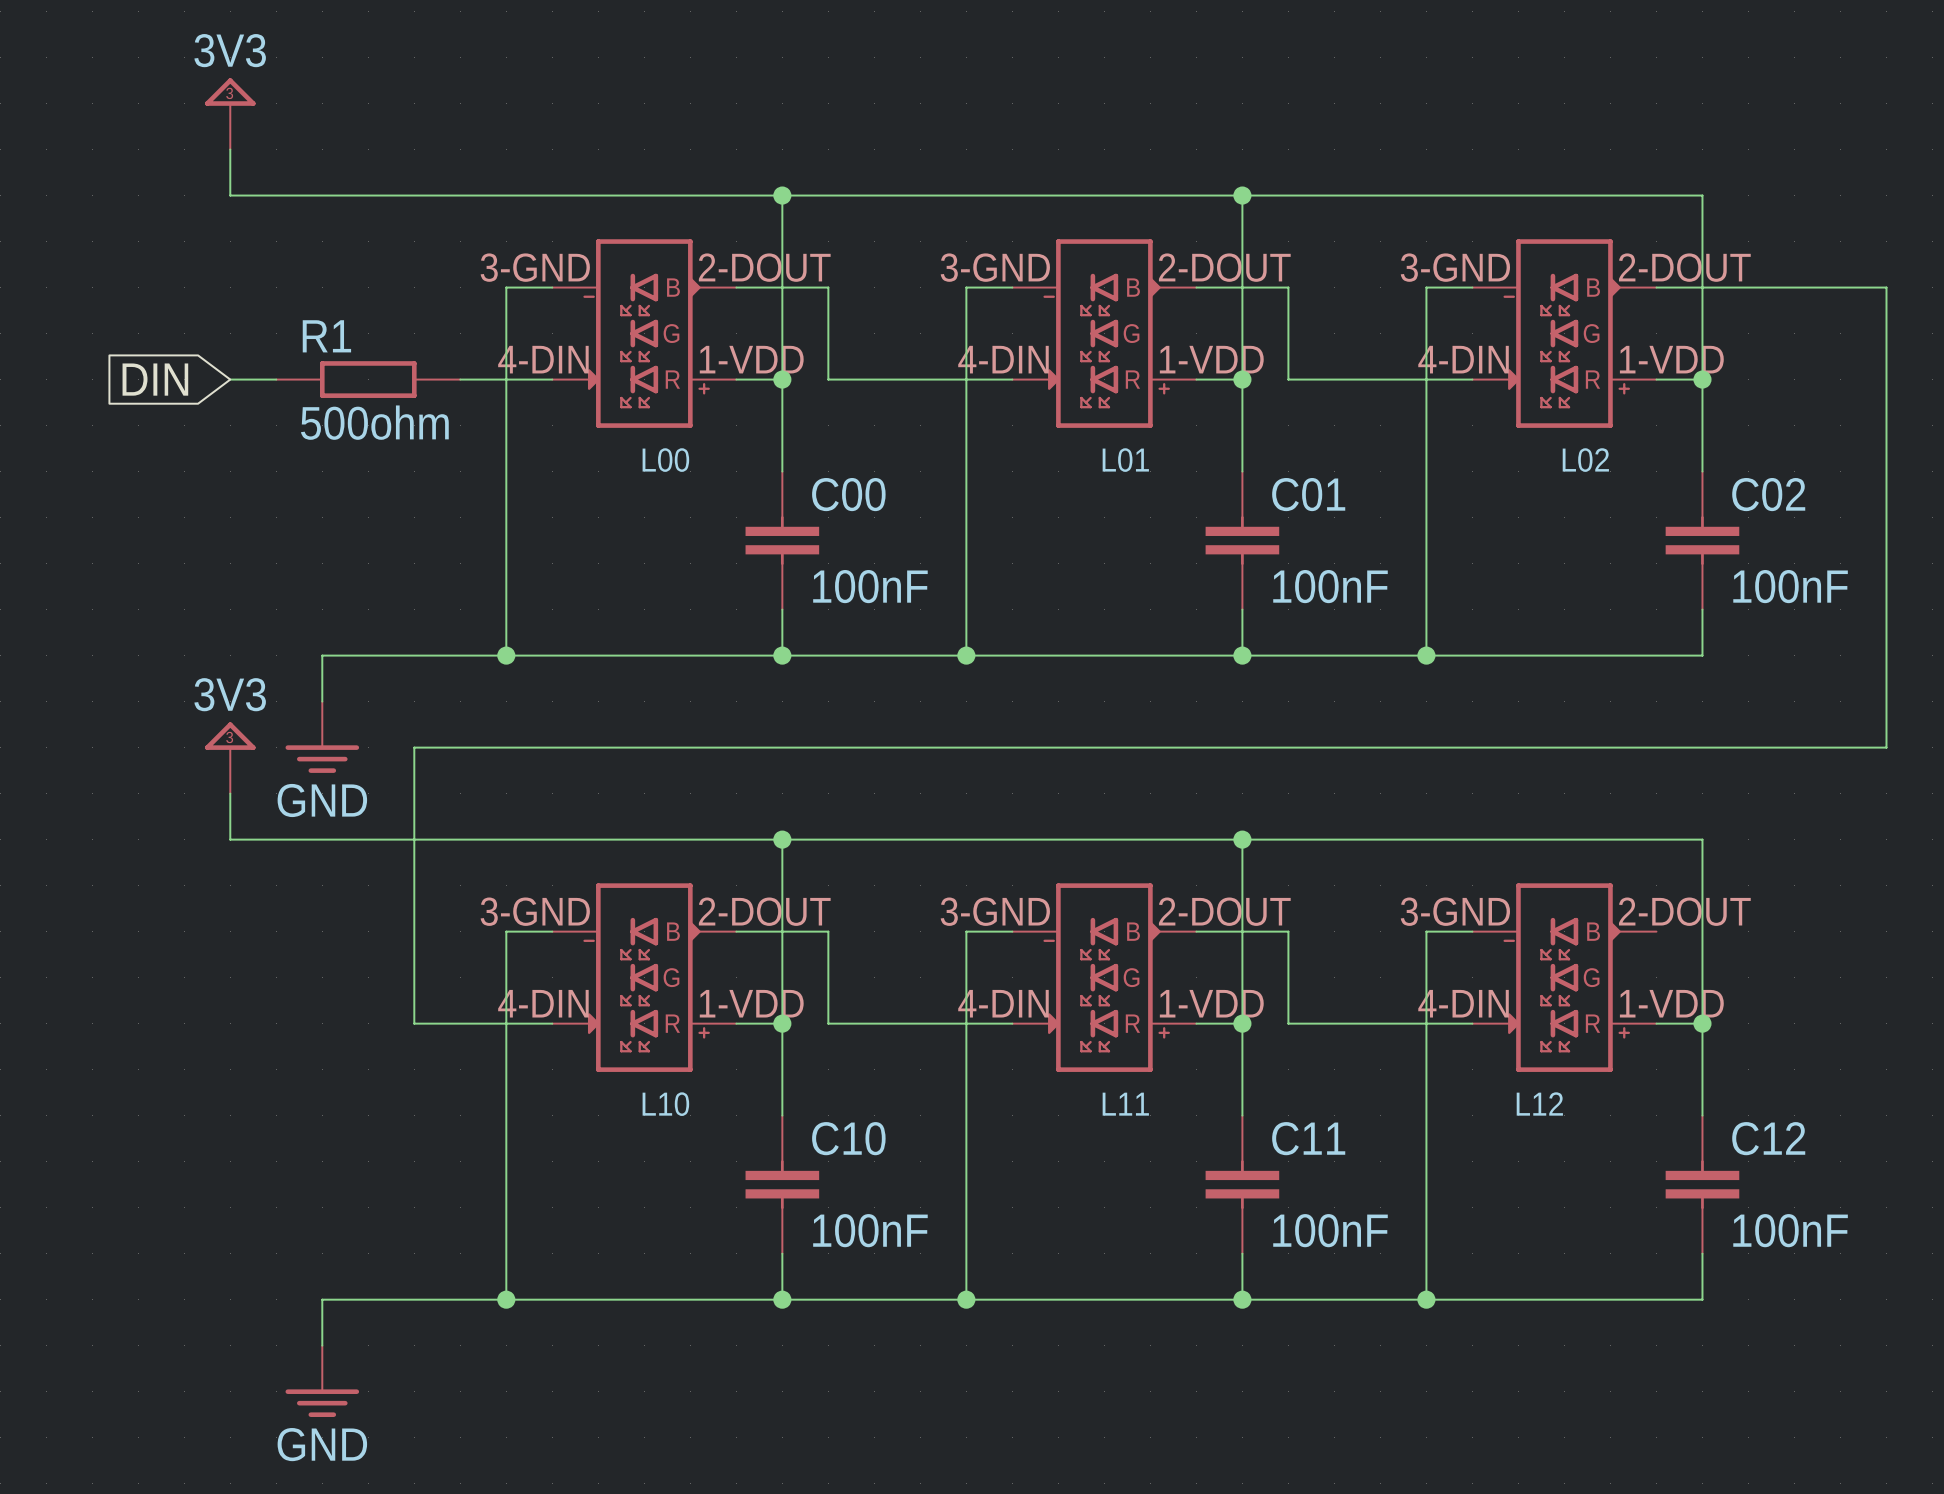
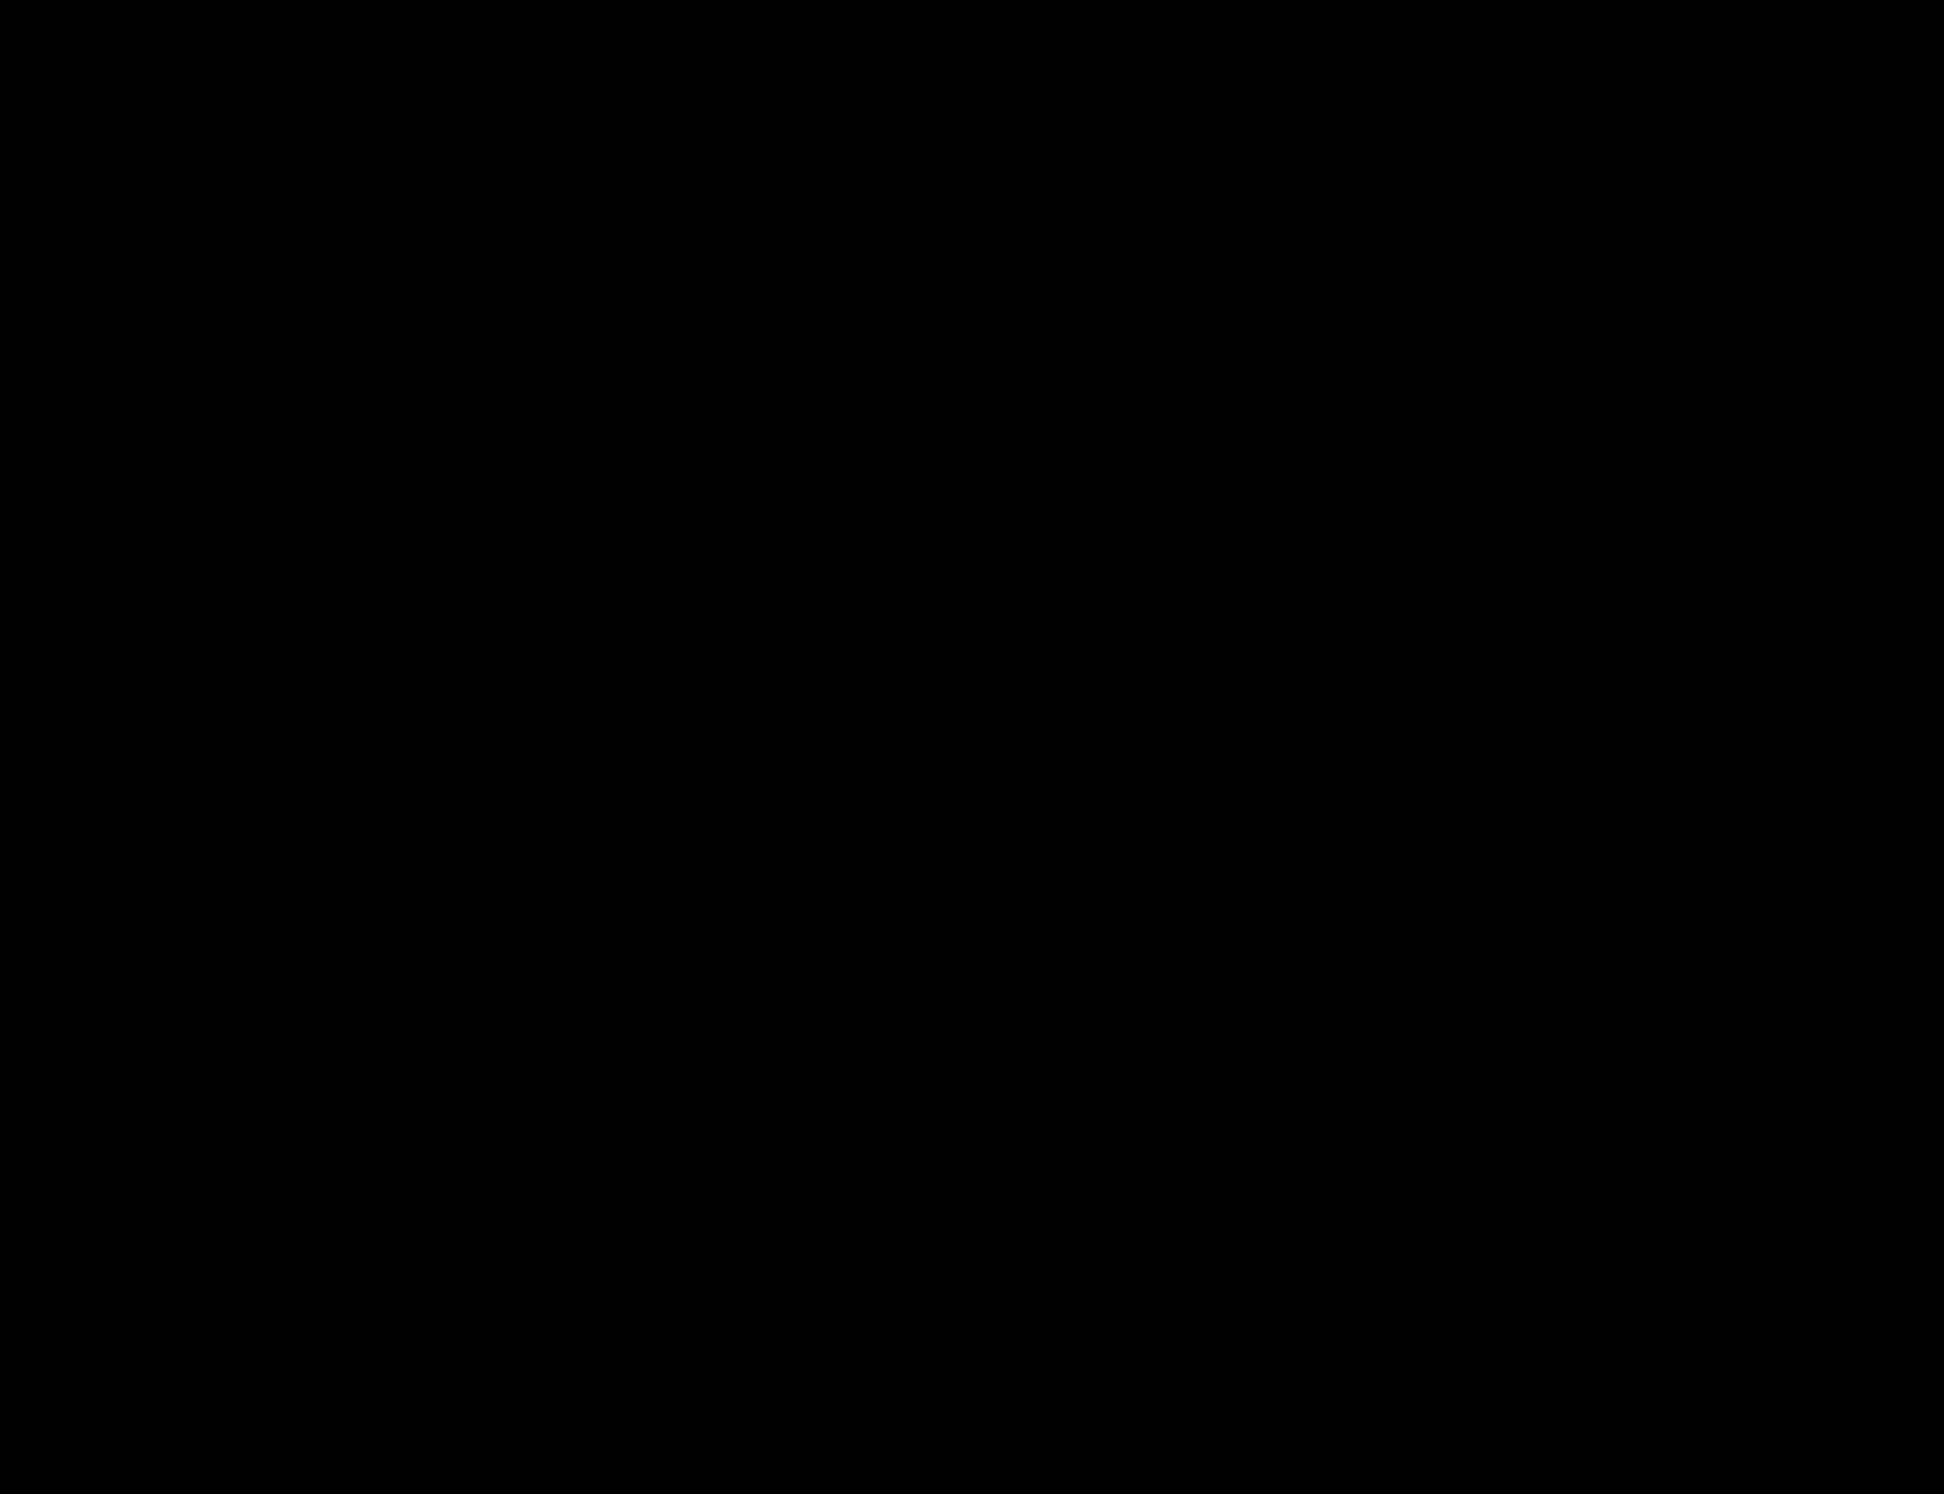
power symbol: 3V3 (230, 113) -> none
wire: (230, 149) (230, 195) (1702, 195) (1702, 471) -> none
wire: (782, 195) (782, 471) -> none
junction: (782, 195) -> none
wire: (1242, 195) (1242, 471) -> none
junction: (1242, 195) -> none
wire: (552, 287) (506, 287) (506, 655) -> none
wire: (736, 287) (828, 287) (828, 379) (1012, 379) -> none
wire: (1012, 287) (966, 287) (966, 655) -> none
wire: (1196, 287) (1288, 287) (1288, 379) (1472, 379) -> none
wire: (1472, 287) (1426, 287) (1426, 655) -> none
wire: (1656, 287) (1886, 287) (1886, 747) (414, 747) (414, 1023) (552, 1023) -> none
L00: (644, 333) -> none
L01: (1104, 333) -> none
L02: (1564, 333) -> none
global label: DIN (155, 379) -> none
wire: (230, 379) (276, 379) -> none
R1: 500ohm (368, 379) -> none
wire: (460, 379) (552, 379) -> none
wire: (736, 379) (782, 379) -> none
junction: (782, 379) -> none
wire: (1196, 379) (1242, 379) -> none
junction: (1242, 379) -> none
wire: (1656, 379) (1702, 379) -> none
junction: (1702, 379) -> none
C00: 100nF (782, 540) -> none
C01: 100nF (1242, 540) -> none
C02: 100nF (1702, 540) -> none
wire: (782, 609) (782, 655) -> none
wire: (1242, 609) (1242, 655) -> none
wire: (1702, 609) (1702, 655) (322, 655) (322, 701) -> none
junction: (506, 655) -> none
junction: (782, 655) -> none
junction: (966, 655) -> none
junction: (1242, 655) -> none
junction: (1426, 655) -> none
power symbol: GND (322, 737) -> none
power symbol: 3V3 (230, 757) -> none
wire: (230, 793) (230, 839) (1702, 839) (1702, 1115) -> none
wire: (782, 839) (782, 1115) -> none
junction: (782, 839) -> none
wire: (1242, 839) (1242, 1115) -> none
junction: (1242, 839) -> none
wire: (552, 931) (506, 931) (506, 1299) -> none
wire: (736, 931) (828, 931) (828, 1023) (1012, 1023) -> none
wire: (1012, 931) (966, 931) (966, 1299) -> none
wire: (1196, 931) (1288, 931) (1288, 1023) (1472, 1023) -> none
wire: (1472, 931) (1426, 931) (1426, 1299) -> none
L10: (644, 977) -> none
L11: (1104, 977) -> none
L12: (1564, 977) -> none
wire: (736, 1023) (782, 1023) -> none
junction: (782, 1023) -> none
wire: (1196, 1023) (1242, 1023) -> none
junction: (1242, 1023) -> none
wire: (1656, 1023) (1702, 1023) -> none
junction: (1702, 1023) -> none
C10: 100nF (782, 1184) -> none
C11: 100nF (1242, 1184) -> none
C12: 100nF (1702, 1184) -> none
wire: (782, 1253) (782, 1299) -> none
wire: (1242, 1253) (1242, 1299) -> none
wire: (1702, 1253) (1702, 1299) (322, 1299) (322, 1345) -> none
junction: (506, 1299) -> none
junction: (782, 1299) -> none
junction: (966, 1299) -> none
junction: (1242, 1299) -> none
junction: (1426, 1299) -> none
power symbol: GND (322, 1381) -> none

